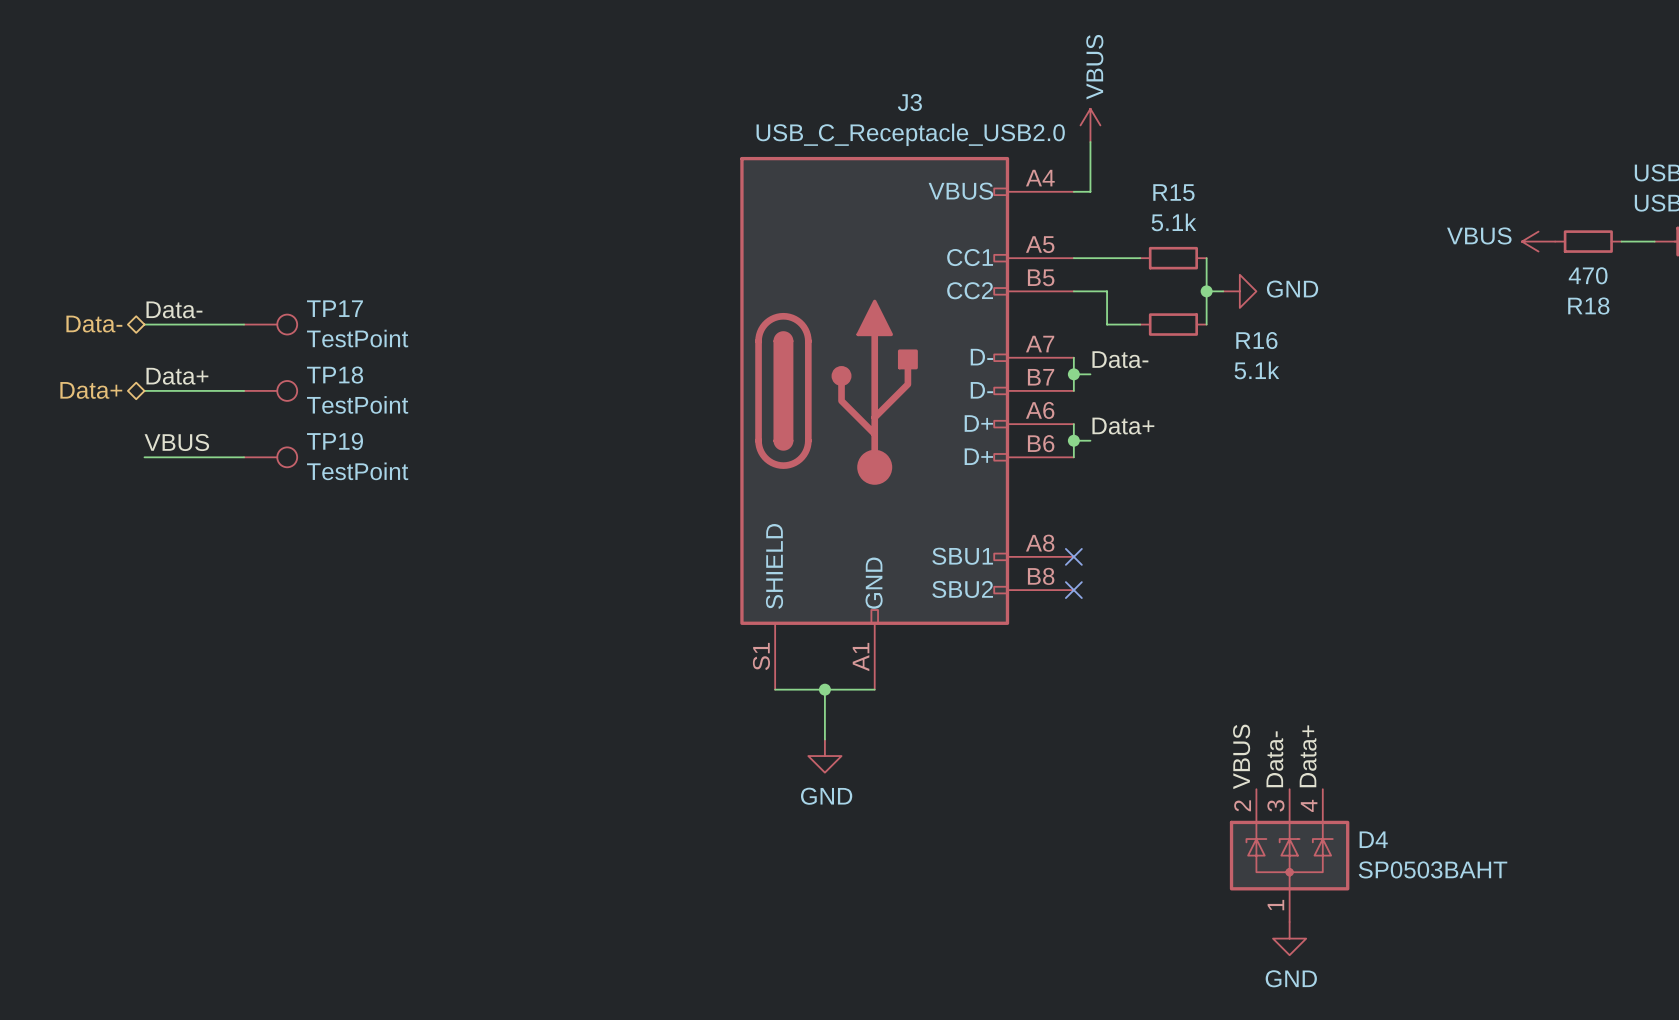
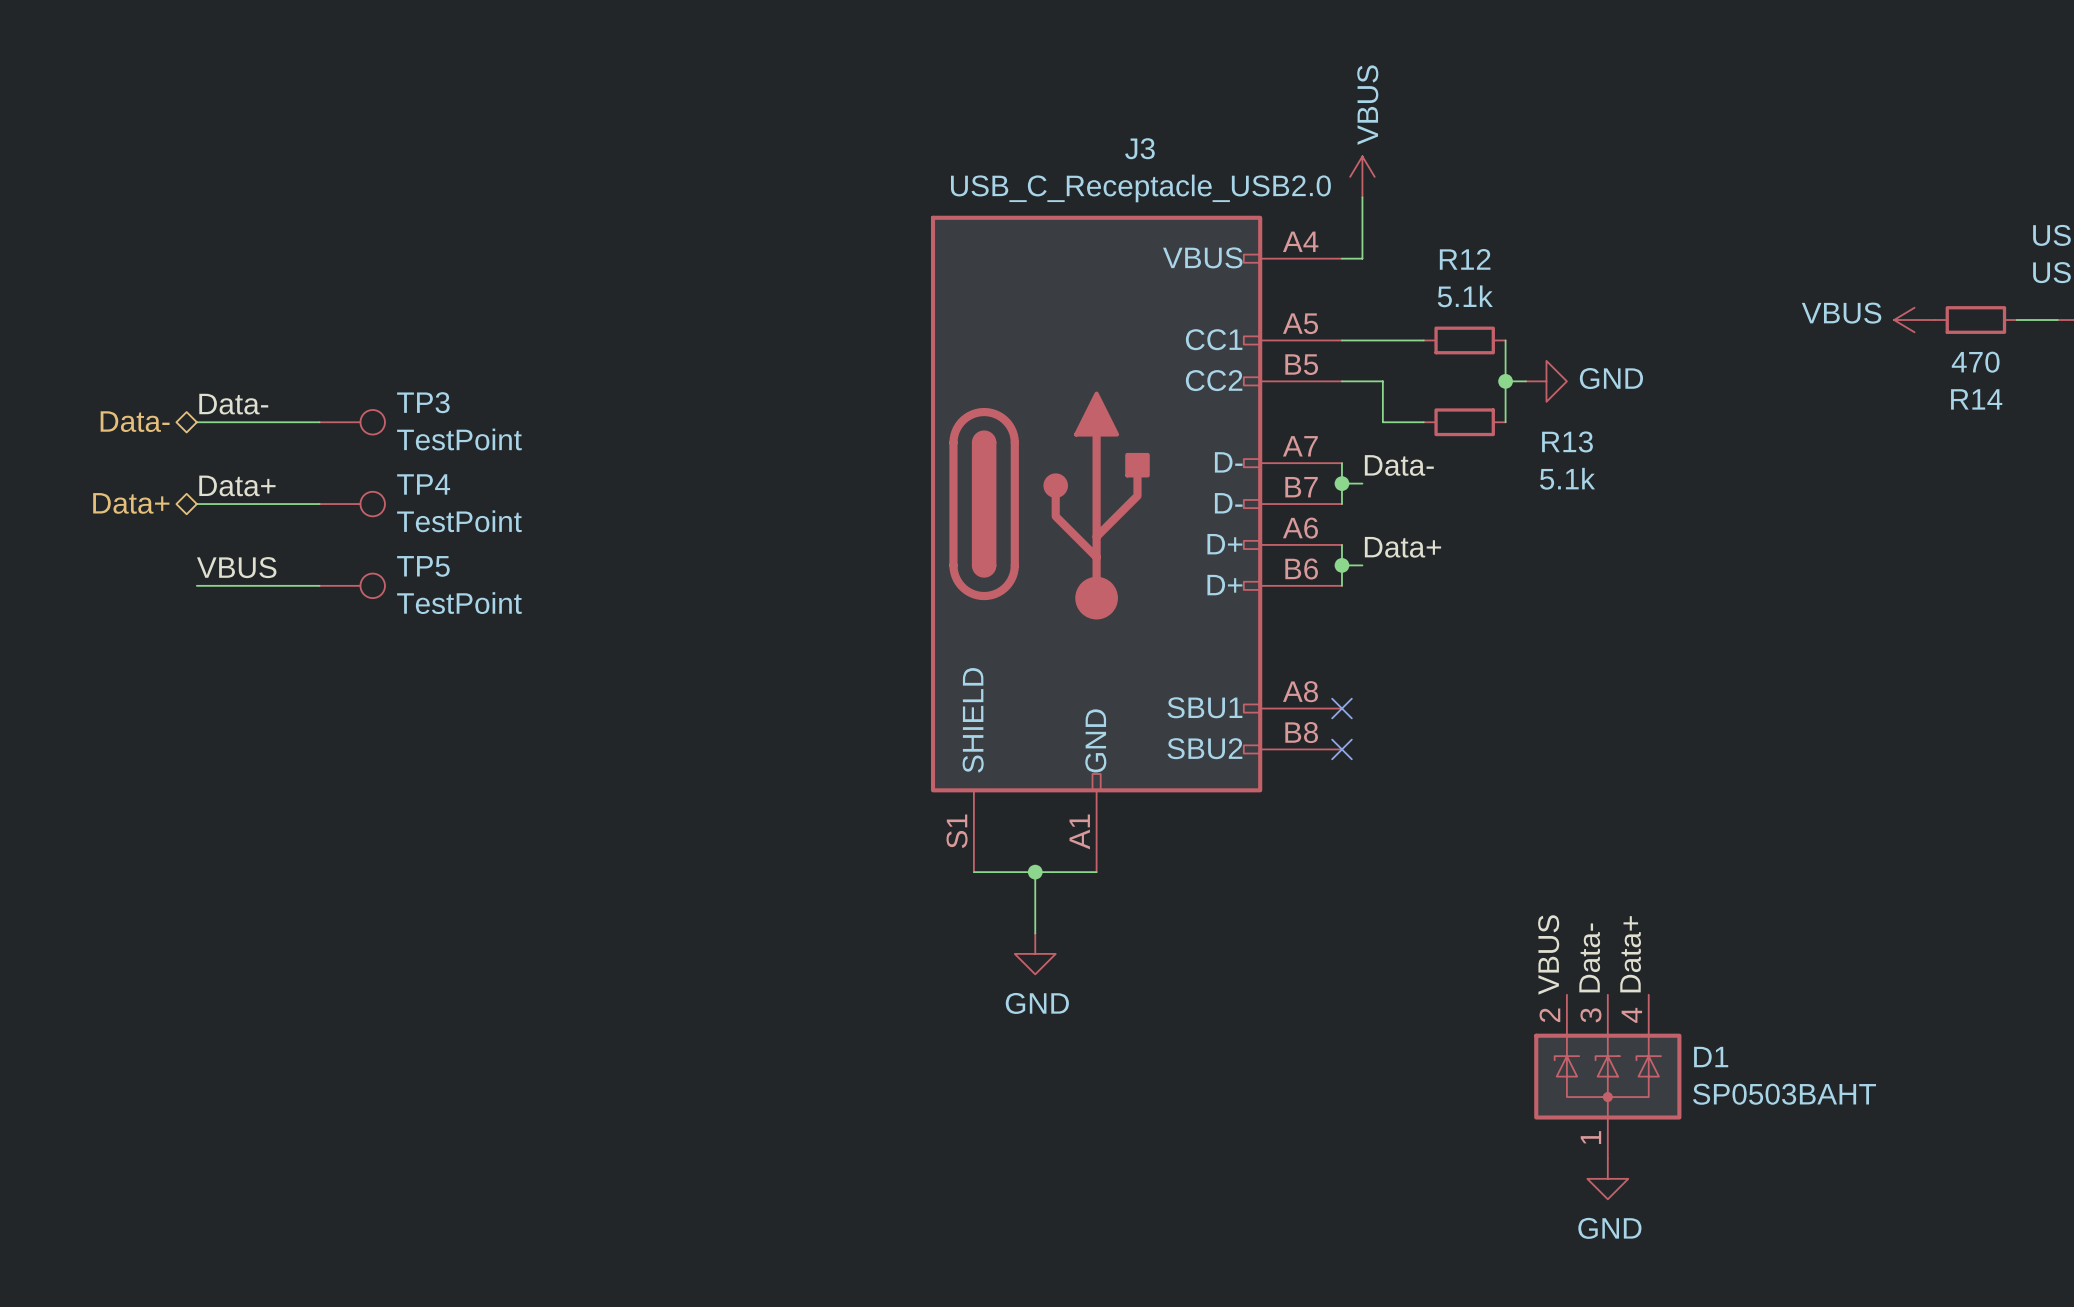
R15 name: R15 (1173, 192) -> R12 (1465, 259)
R18 name: R18 (1588, 306) -> R14 (1976, 399)
TP17 name: TP17 (334, 308) -> TP3 (423, 402)
R16 name: R16 (1256, 340) -> R13 (1567, 441)
TP18 name: TP18 (335, 375) -> TP4 (423, 484)
TP19 name: TP19 (335, 441) -> TP5 (423, 566)
D4 name: D4 (1373, 839) -> D1 (1711, 1057)

